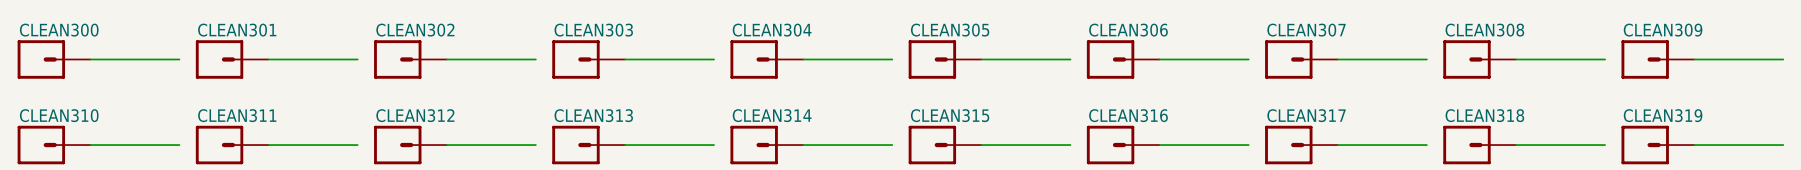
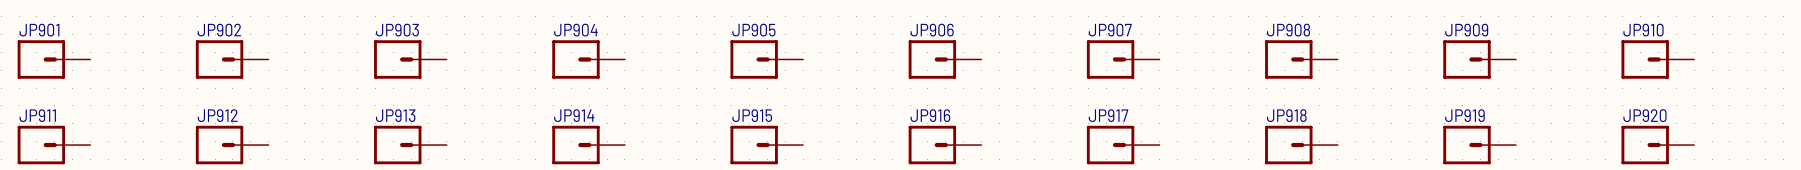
CLEAN300 name: CLEAN300 (59, 30) -> JP901 (39, 30)
CLEAN301 name: CLEAN301 (237, 30) -> JP902 (219, 30)
CLEAN302 name: CLEAN302 (415, 30) -> JP903 (397, 30)
CLEAN303 name: CLEAN303 (593, 30) -> JP904 (575, 30)
CLEAN304 name: CLEAN304 (772, 30) -> JP905 (753, 30)
CLEAN305 name: CLEAN305 (950, 30) -> JP906 (932, 30)
CLEAN306 name: CLEAN306 (1128, 30) -> JP907 (1110, 30)
CLEAN307 name: CLEAN307 (1306, 30) -> JP908 (1288, 30)
CLEAN308 name: CLEAN308 (1484, 30) -> JP909 (1466, 30)
CLEAN309 name: CLEAN309 (1663, 30) -> JP910 (1643, 30)
wire: (90, 59) (179, 59) -> none
wire: (268, 59) (357, 59) -> none
wire: (446, 59) (535, 59) -> none
wire: (624, 59) (714, 59) -> none
wire: (803, 59) (892, 59) -> none
wire: (981, 59) (1070, 59) -> none
wire: (1159, 59) (1248, 59) -> none
wire: (1337, 59) (1426, 59) -> none
wire: (1515, 59) (1605, 59) -> none
wire: (1694, 59) (1783, 59) -> none
CLEAN310 name: CLEAN310 (59, 115) -> JP911 (37, 115)
CLEAN311 name: CLEAN311 (237, 115) -> JP912 (217, 115)
CLEAN312 name: CLEAN312 (415, 115) -> JP913 (395, 115)
CLEAN313 name: CLEAN313 (593, 115) -> JP914 (574, 115)
CLEAN314 name: CLEAN314 (772, 115) -> JP915 (752, 115)
CLEAN315 name: CLEAN315 (950, 115) -> JP916 (930, 115)
CLEAN316 name: CLEAN316 (1128, 115) -> JP917 (1108, 115)
CLEAN317 name: CLEAN317 (1306, 115) -> JP918 (1286, 115)
CLEAN318 name: CLEAN318 (1484, 115) -> JP919 (1464, 115)
CLEAN319 name: CLEAN319 (1663, 115) -> JP920 (1644, 115)
wire: (90, 145) (179, 145) -> none
wire: (268, 145) (357, 145) -> none
wire: (446, 145) (535, 145) -> none
wire: (624, 145) (714, 145) -> none
wire: (803, 145) (892, 145) -> none
wire: (981, 145) (1070, 145) -> none
wire: (1159, 145) (1248, 145) -> none
wire: (1337, 145) (1426, 145) -> none
wire: (1515, 145) (1605, 145) -> none
wire: (1694, 145) (1783, 145) -> none

